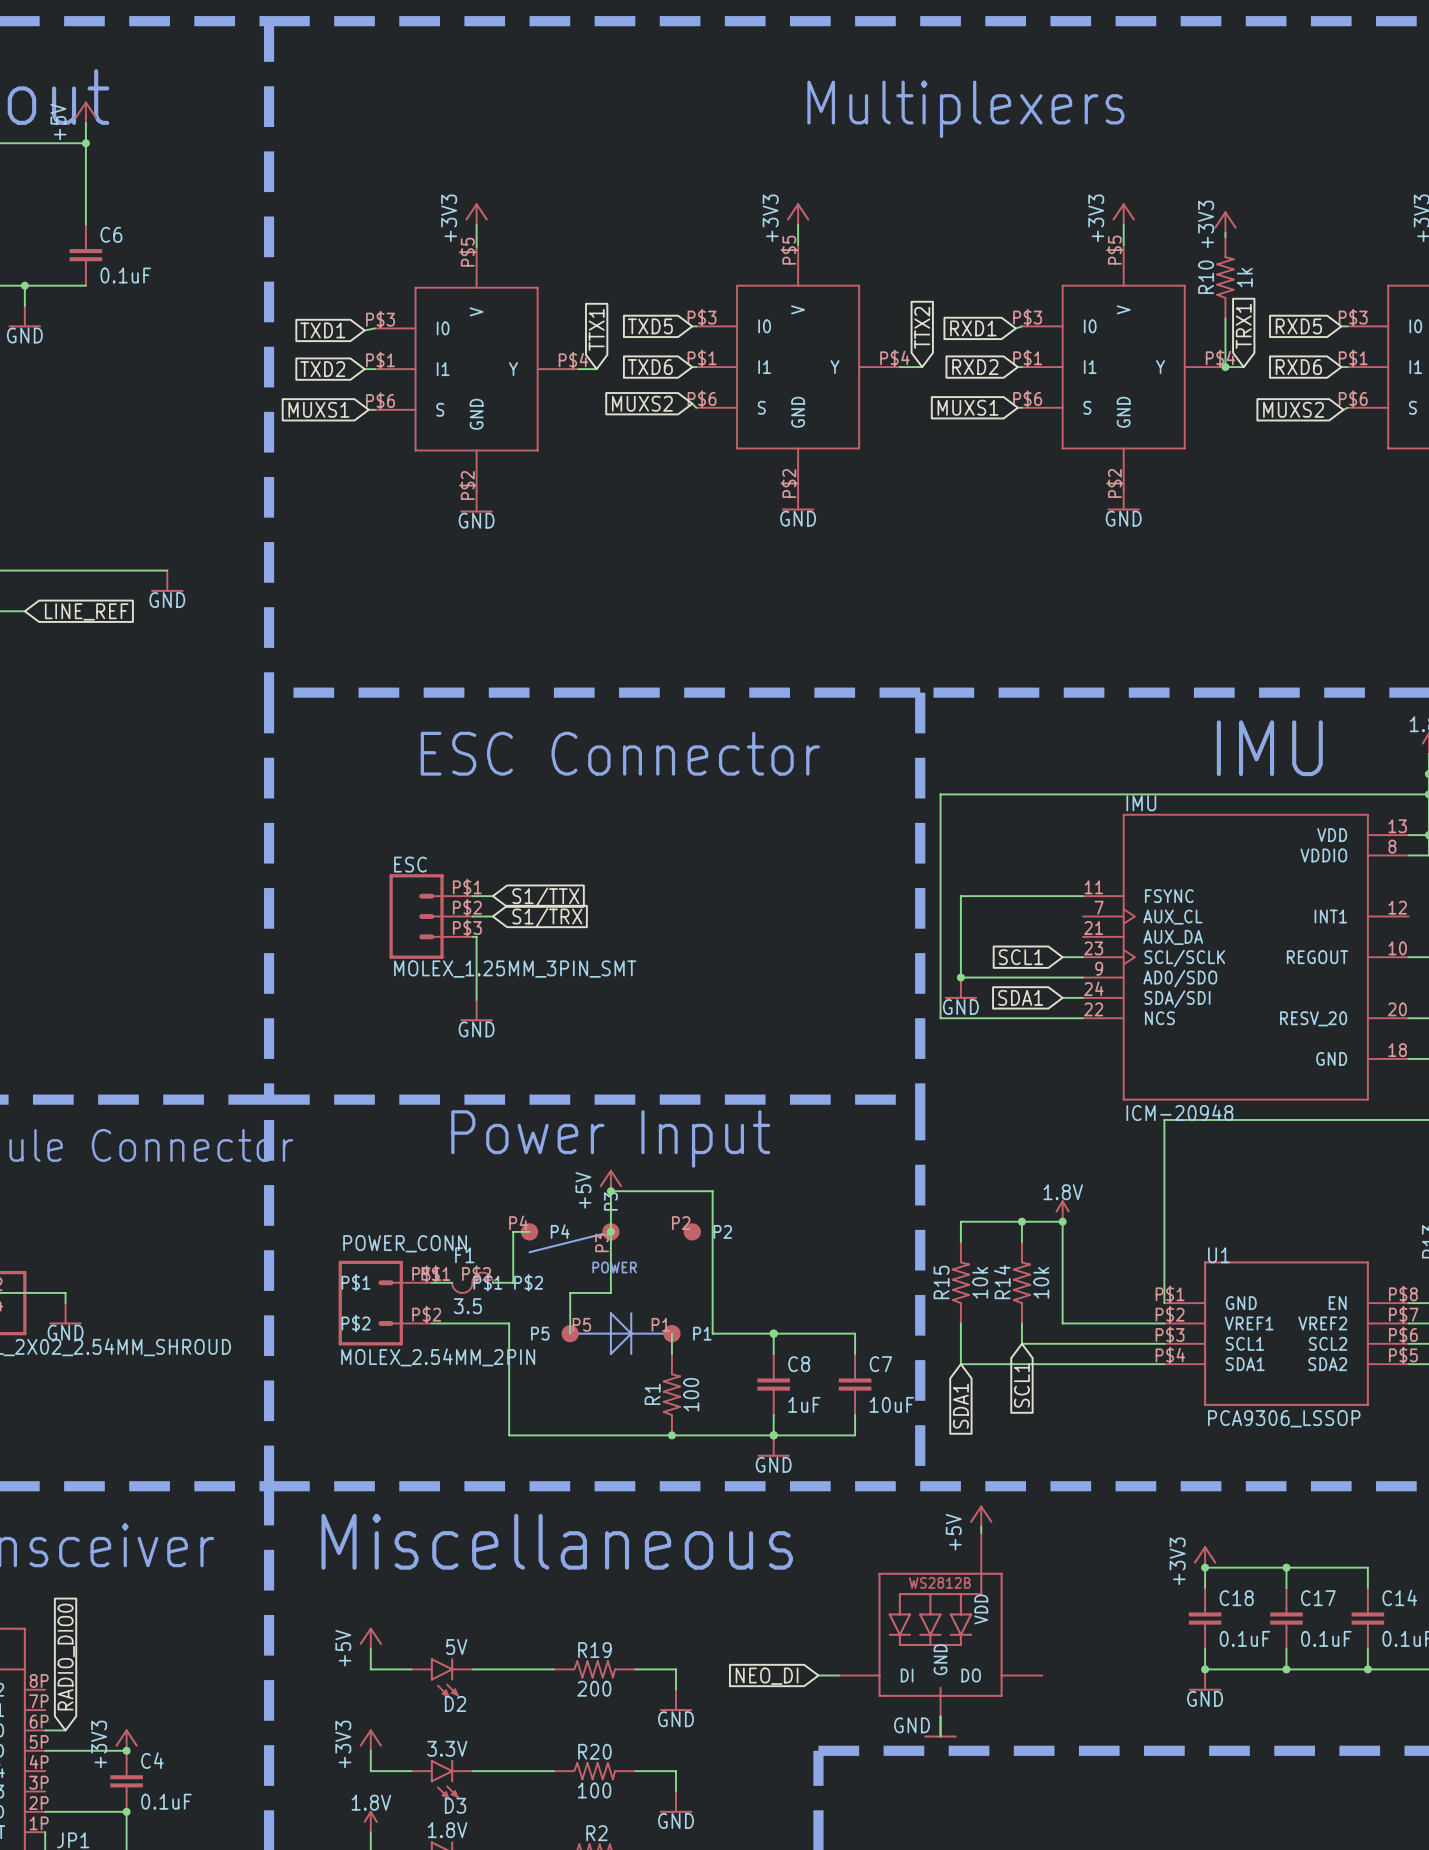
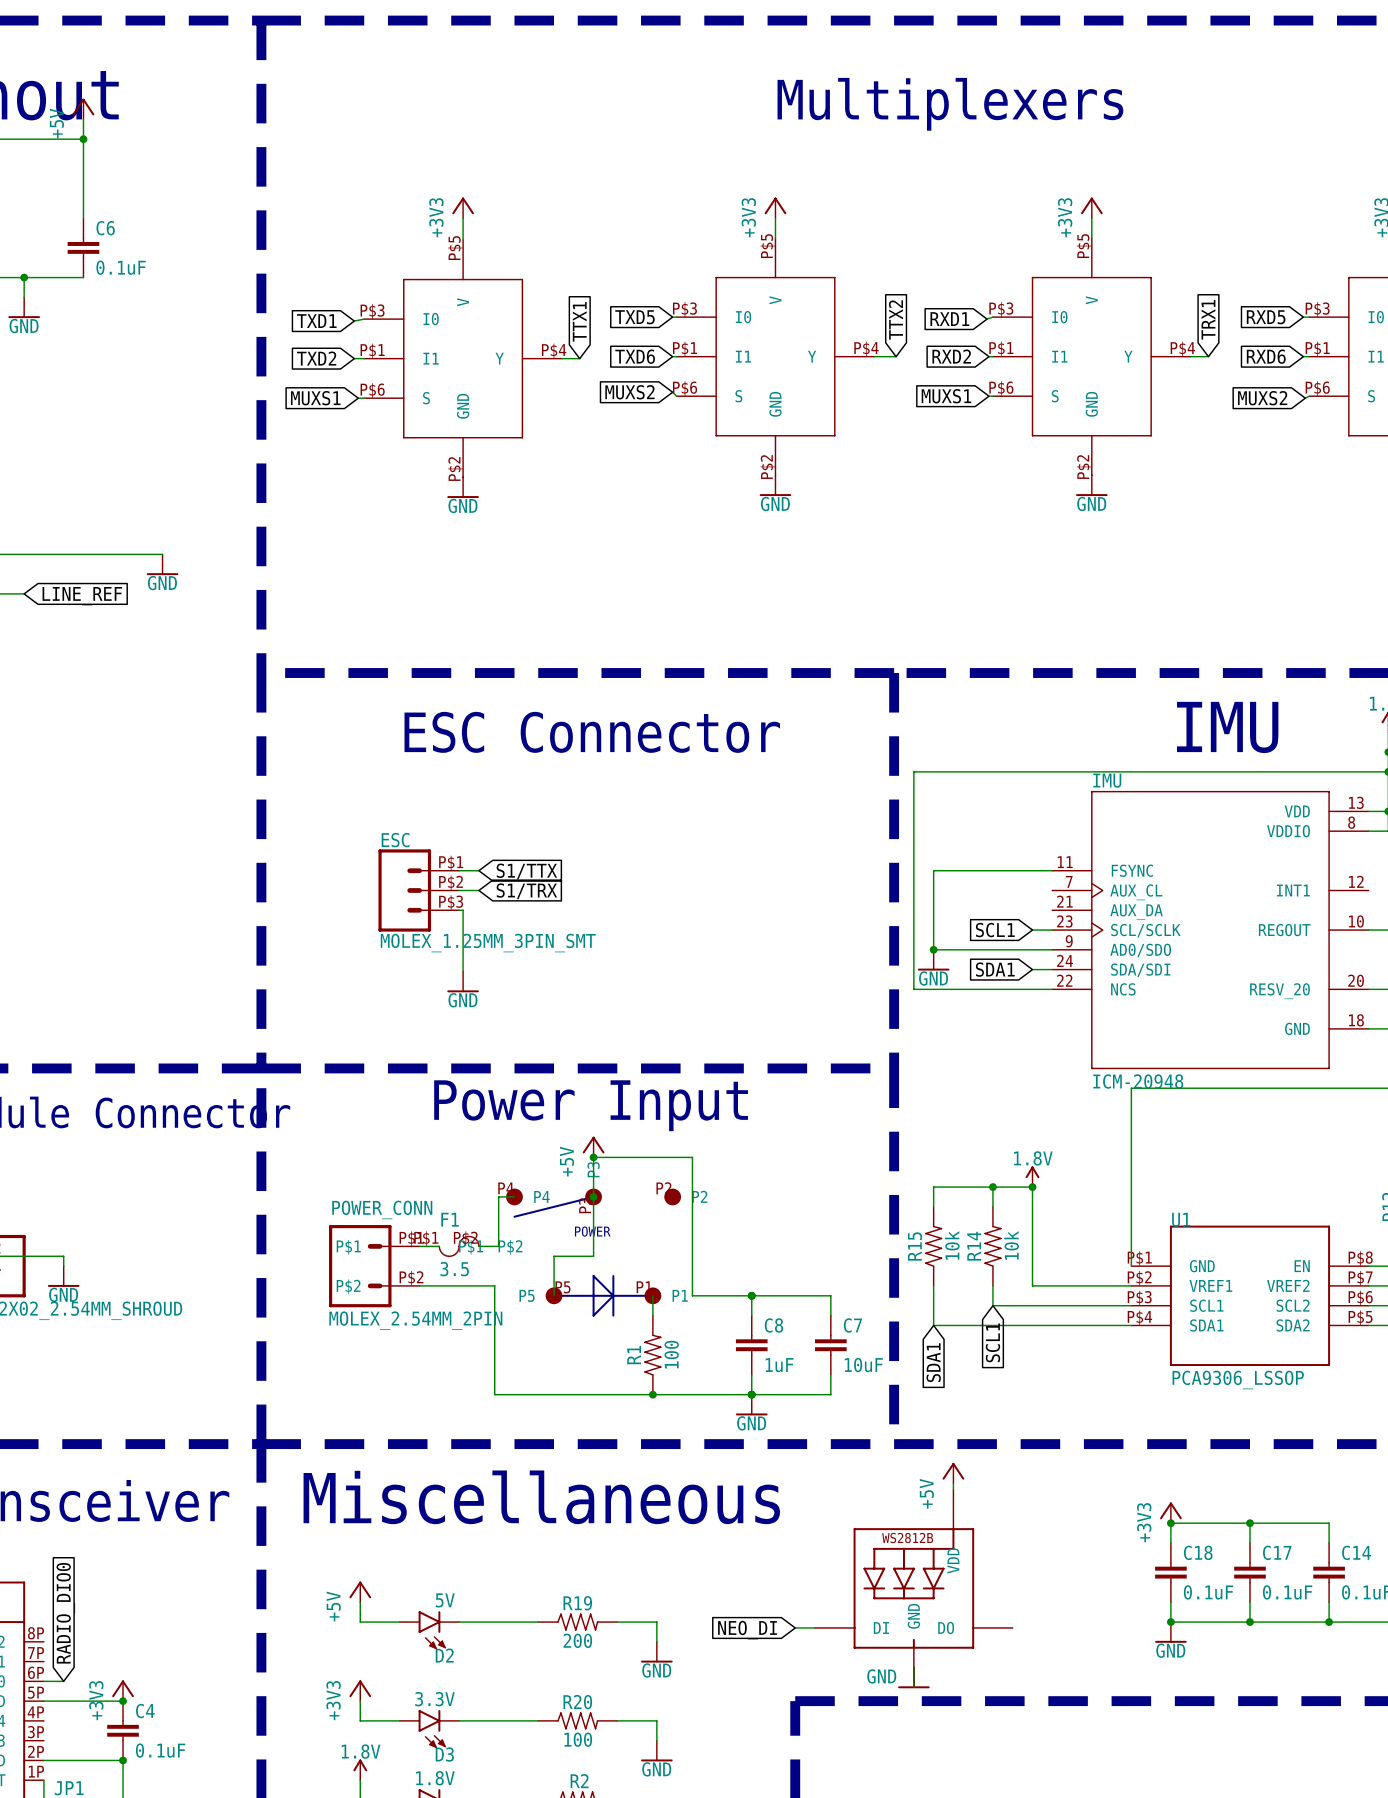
power symbol: +3V3 (1225, 222) -> none
wire: (1225, 232) (1225, 236) -> none
R10: 1k (1225, 277) -> none
wire: (1225, 318) (1225, 367) -> none
junction: (1225, 367) -> none

